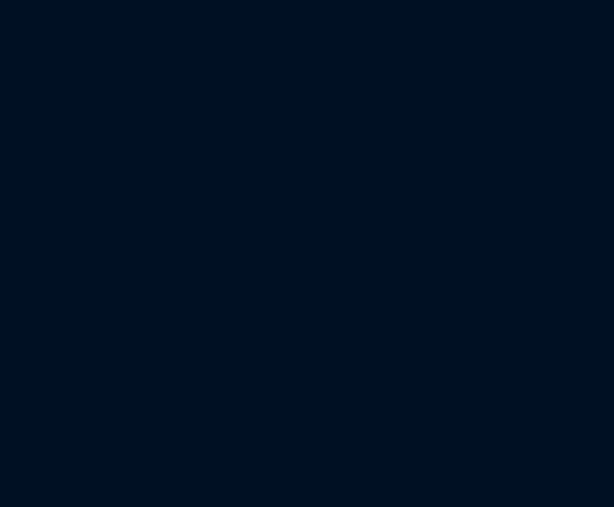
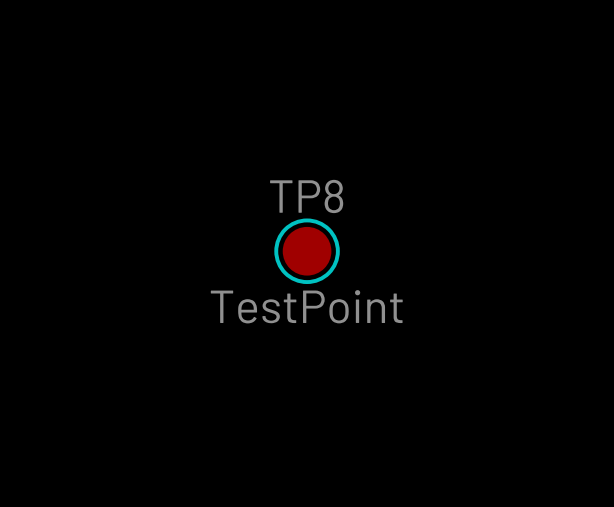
TP8: none -> TestPoint (307, 251)

